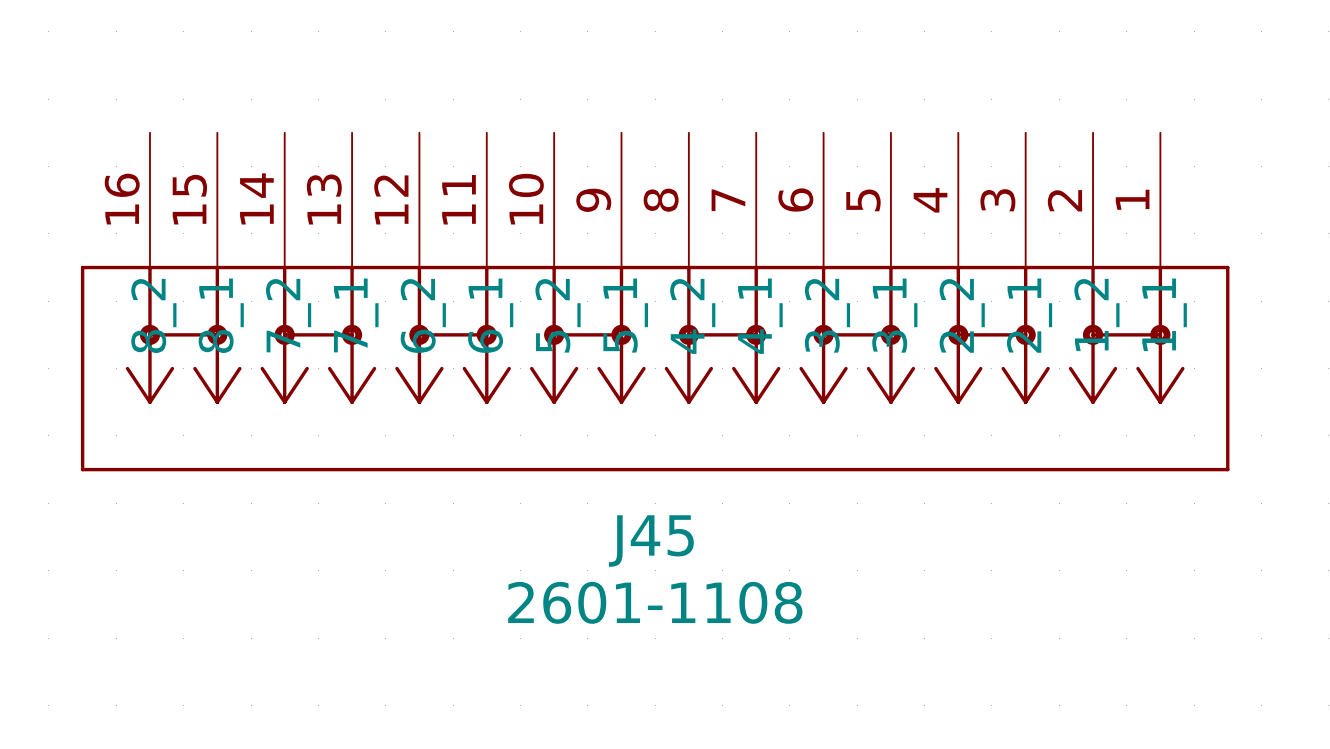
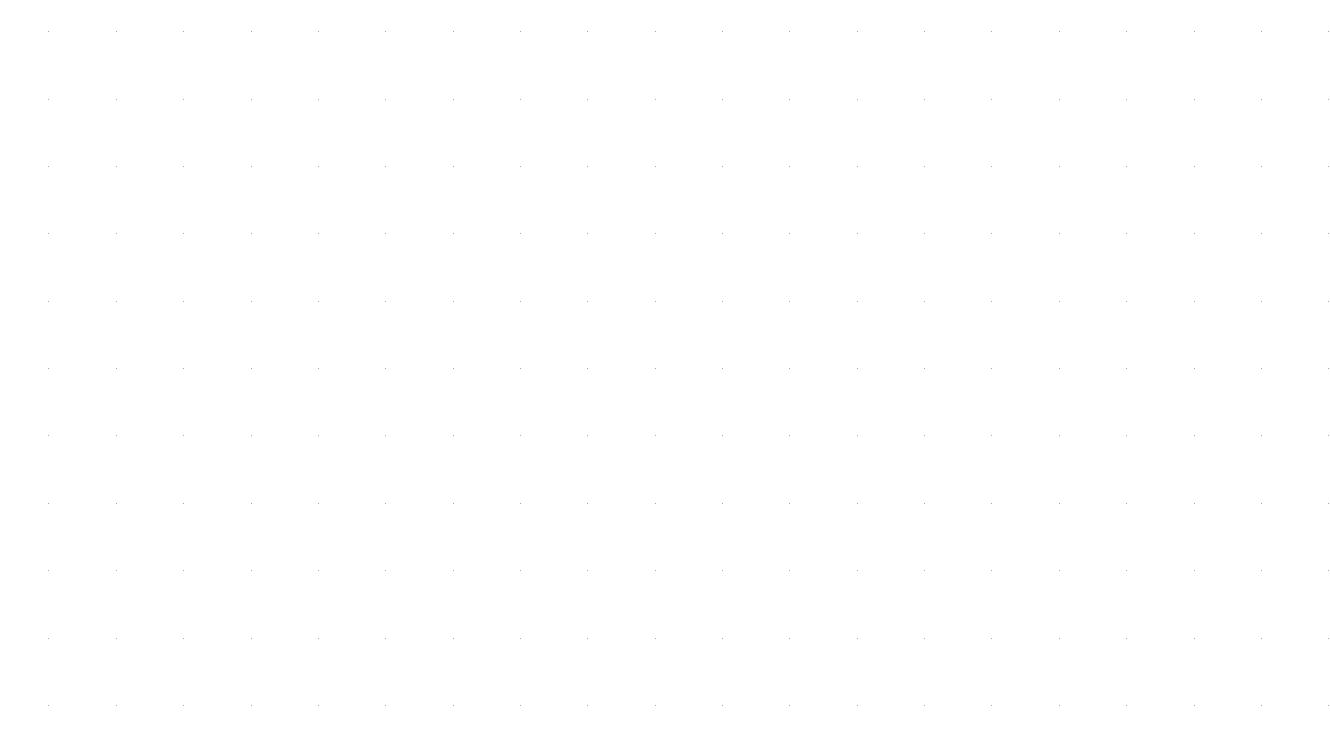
J45: 2601-1108 (655, 302) -> none

